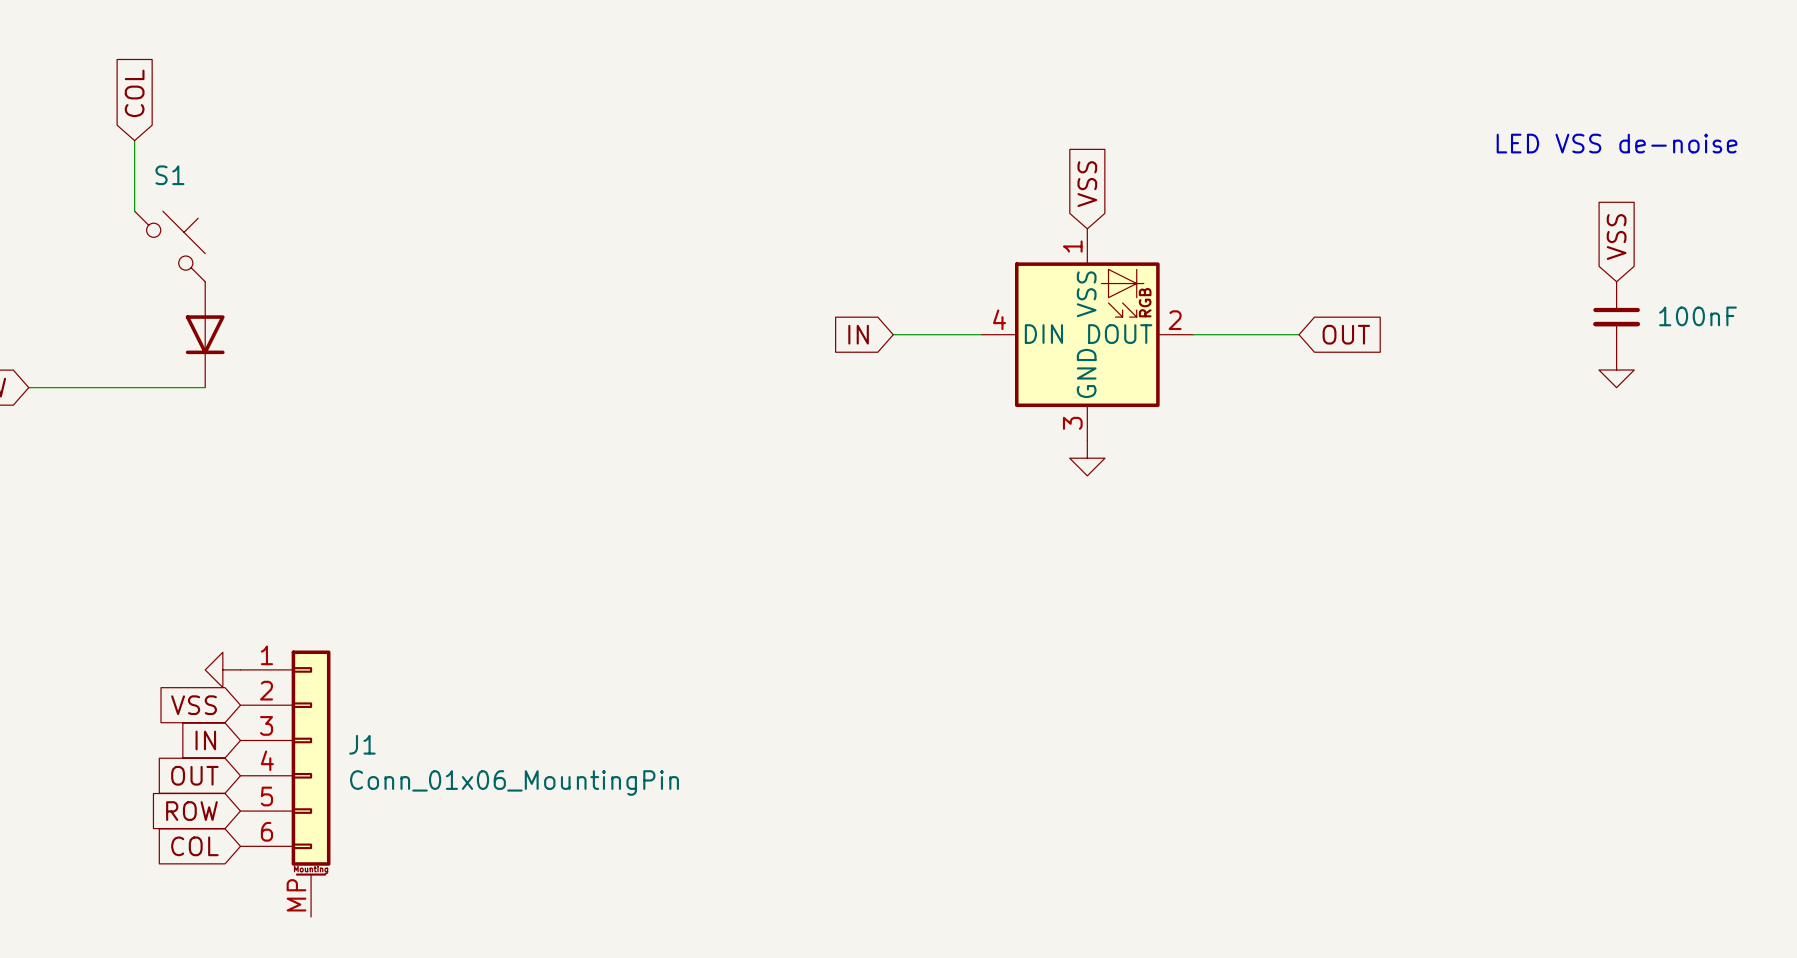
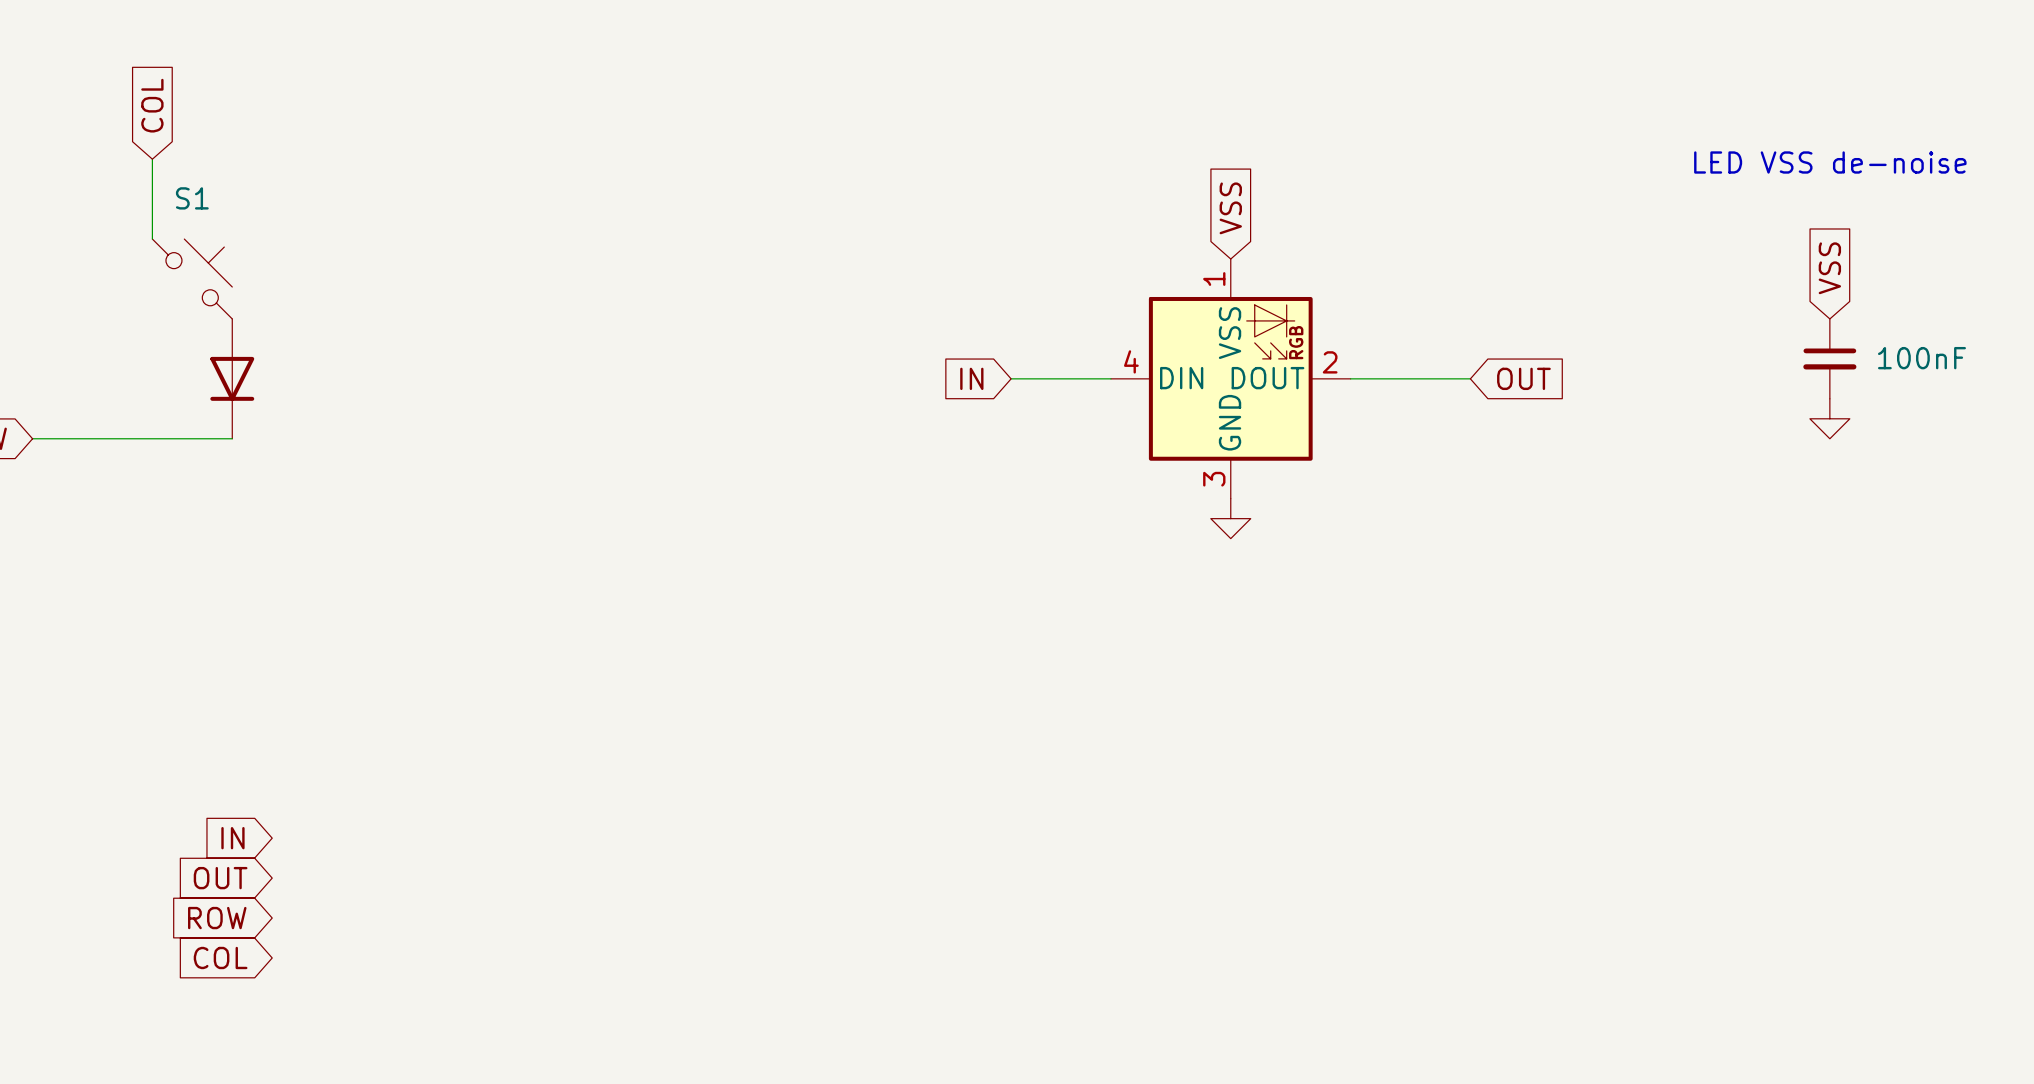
power symbol: (222, 669) -> none
global label: VSS (194, 705) -> none
J1: Conn_01x06_MountingPin (285, 783) -> none

